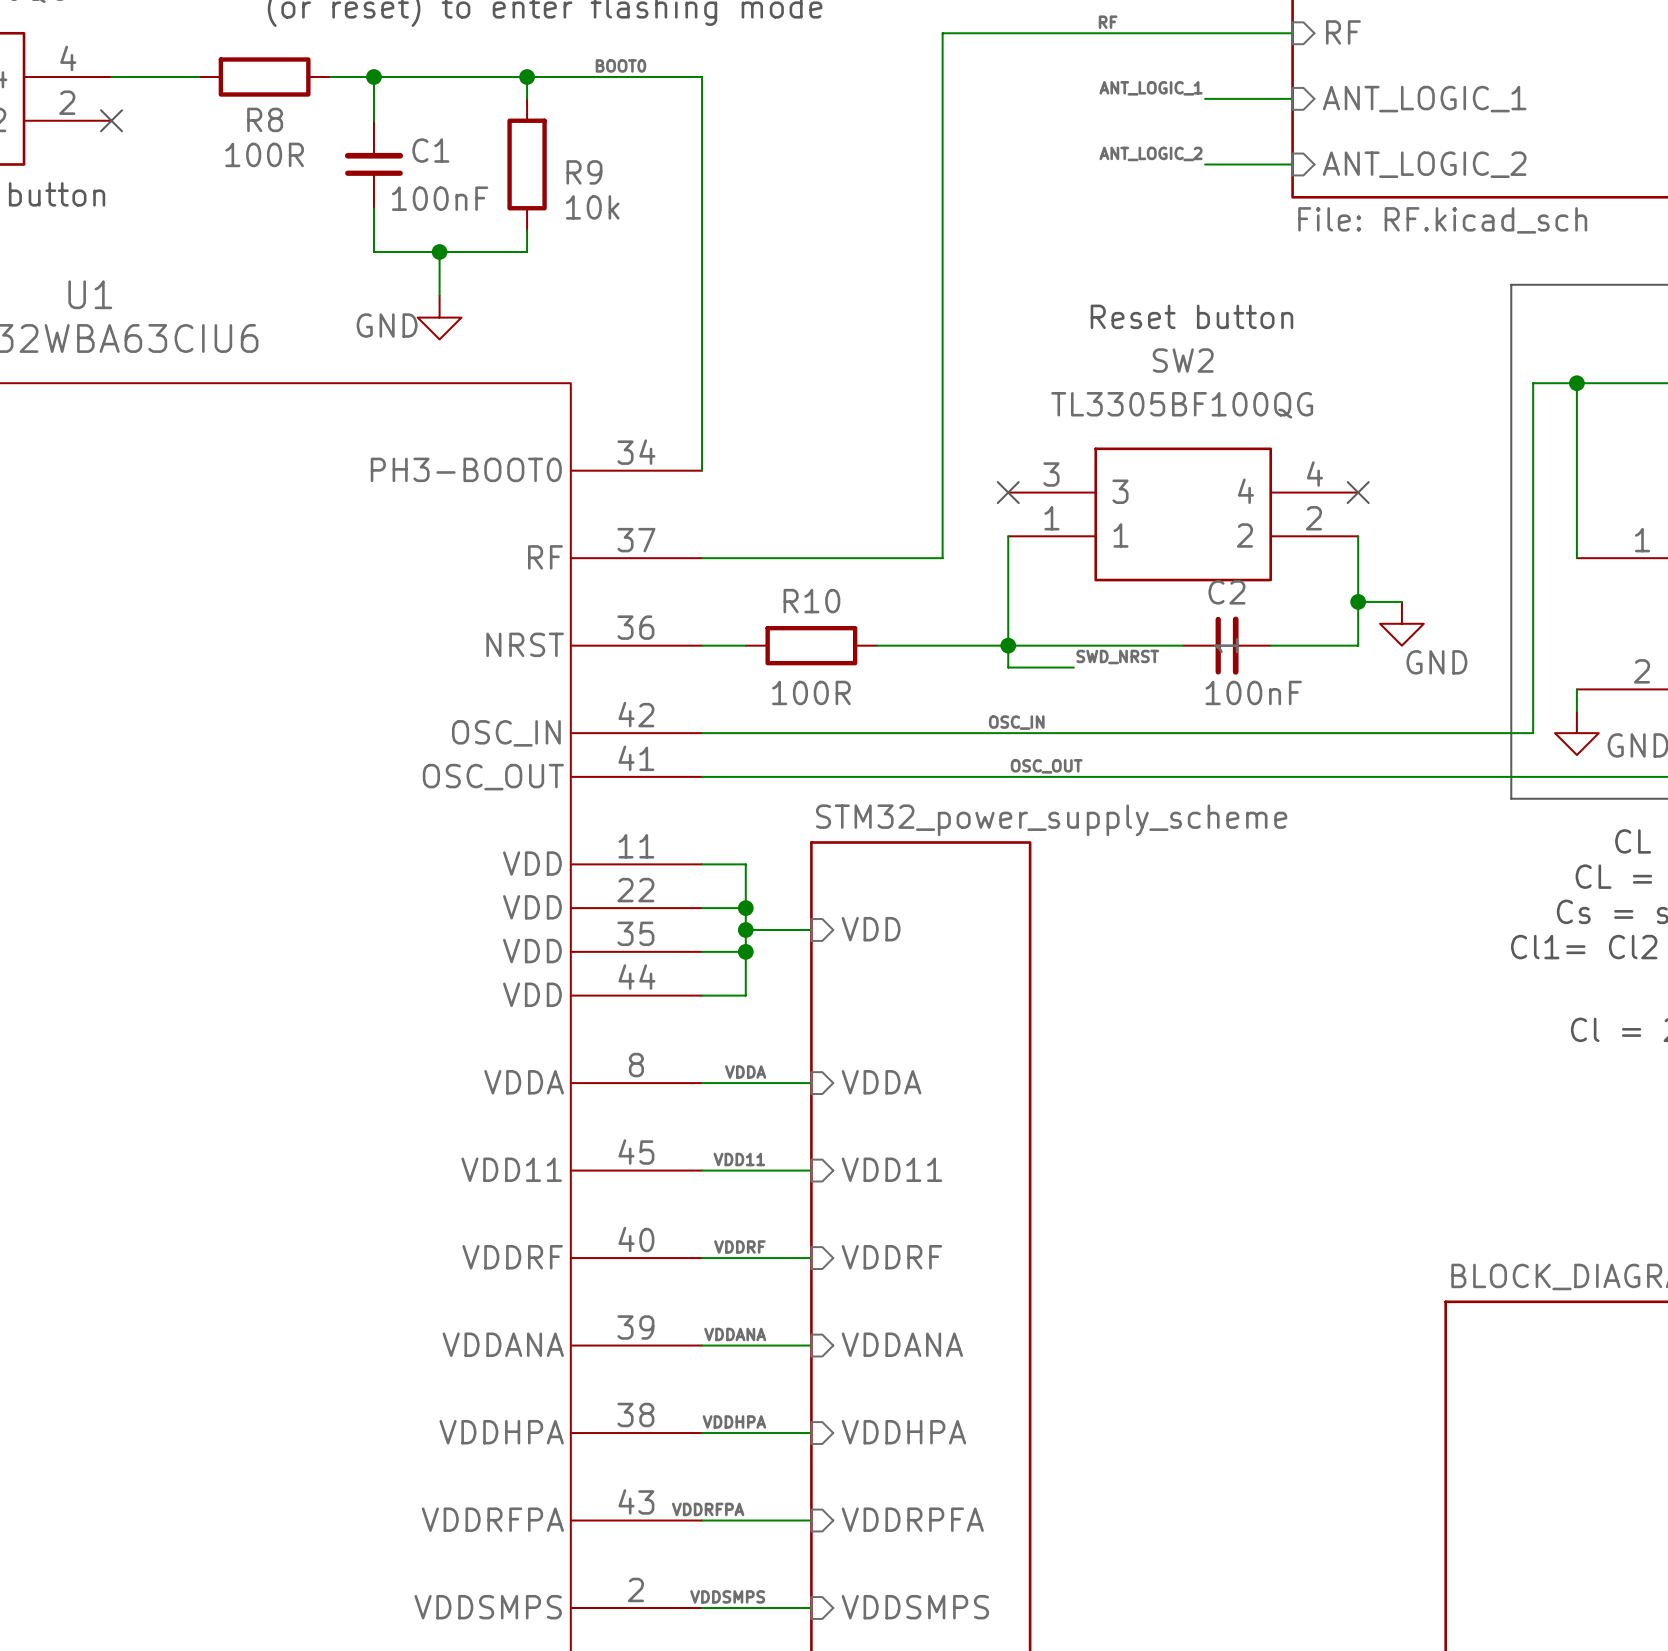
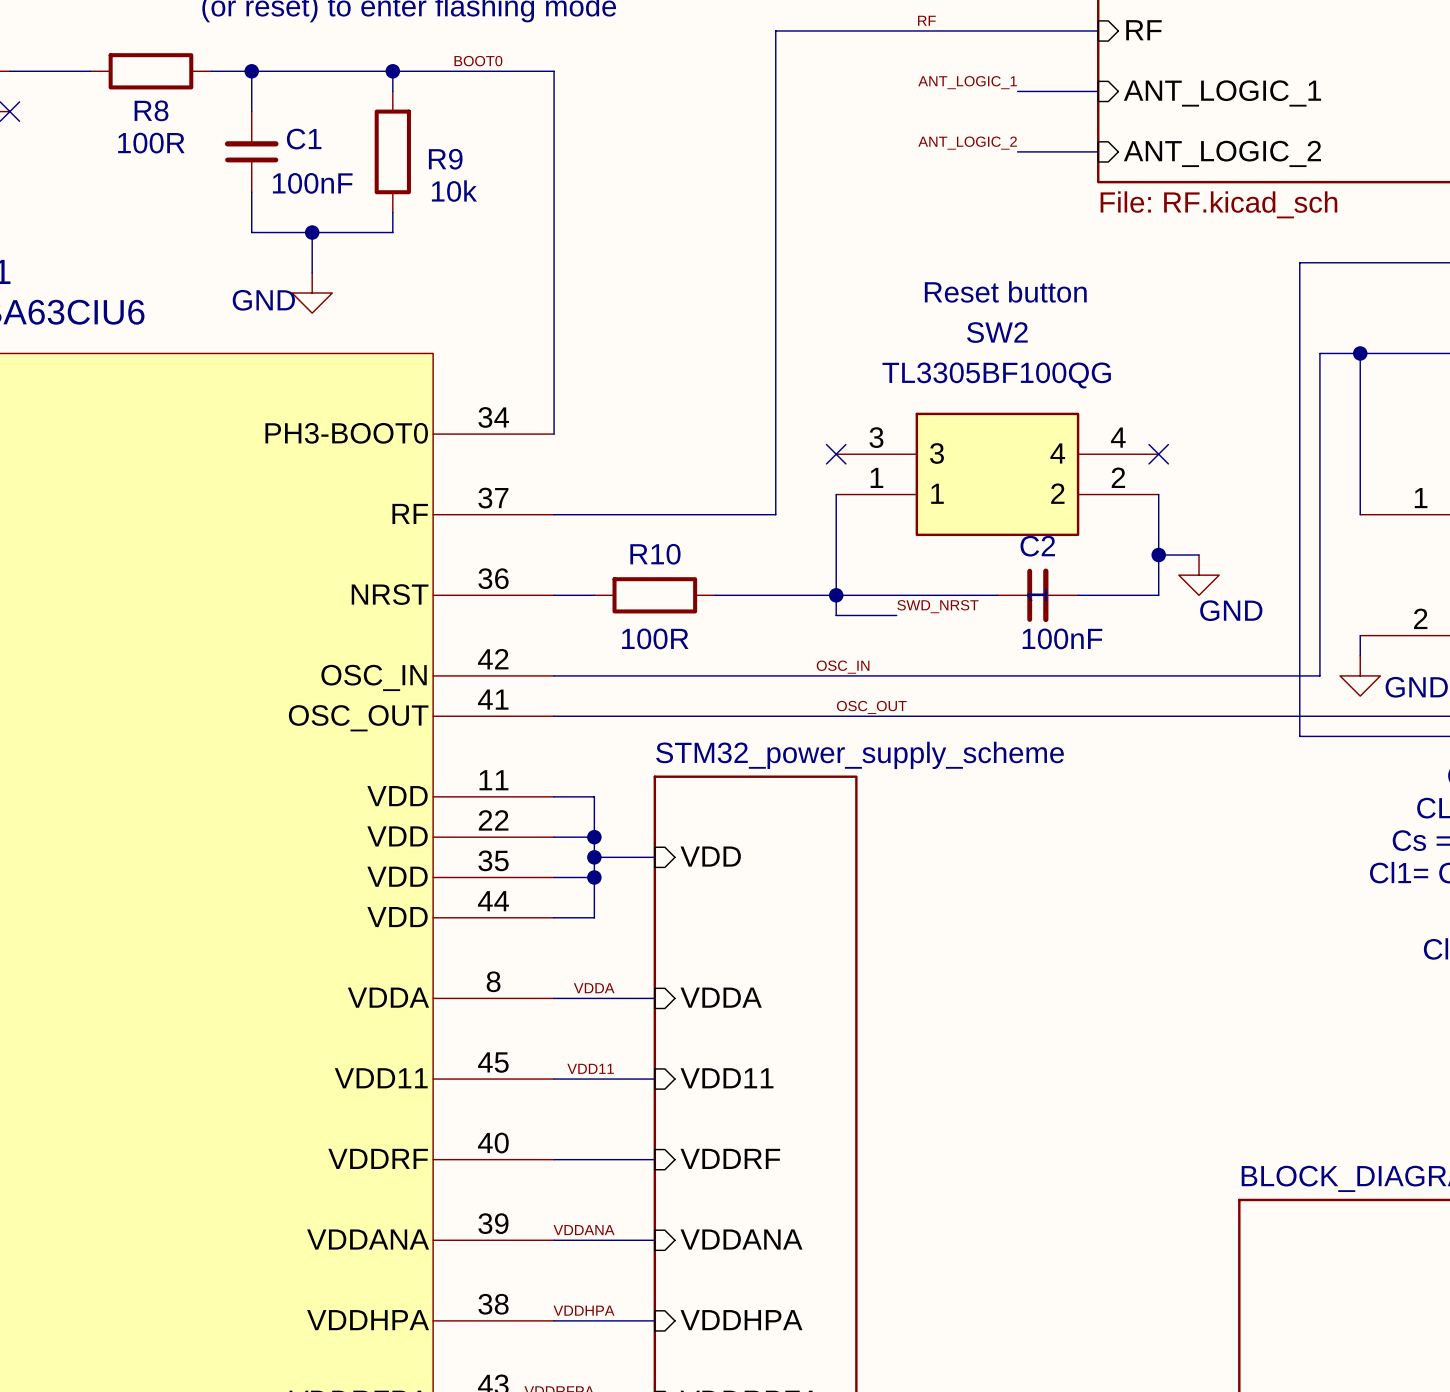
label: VDDRF (739, 1246) -> none

